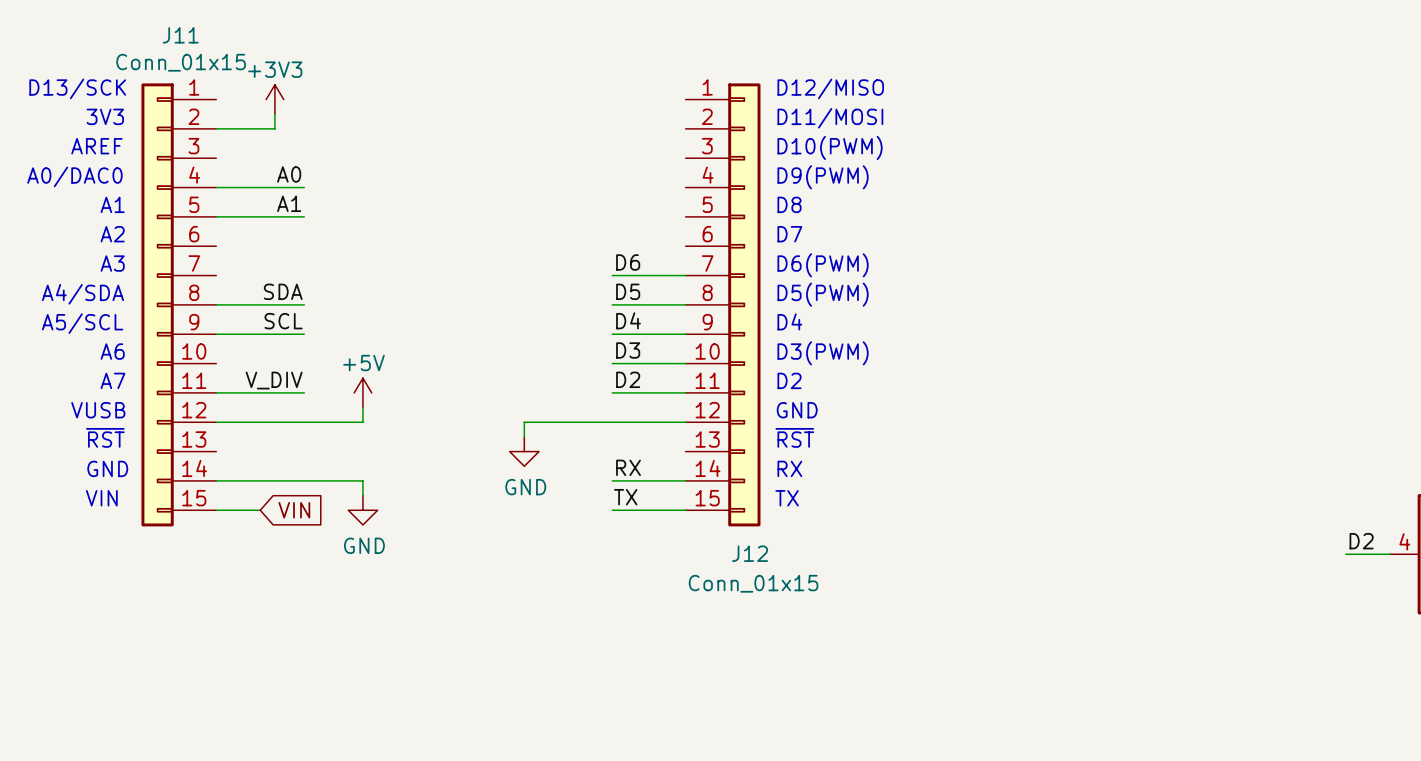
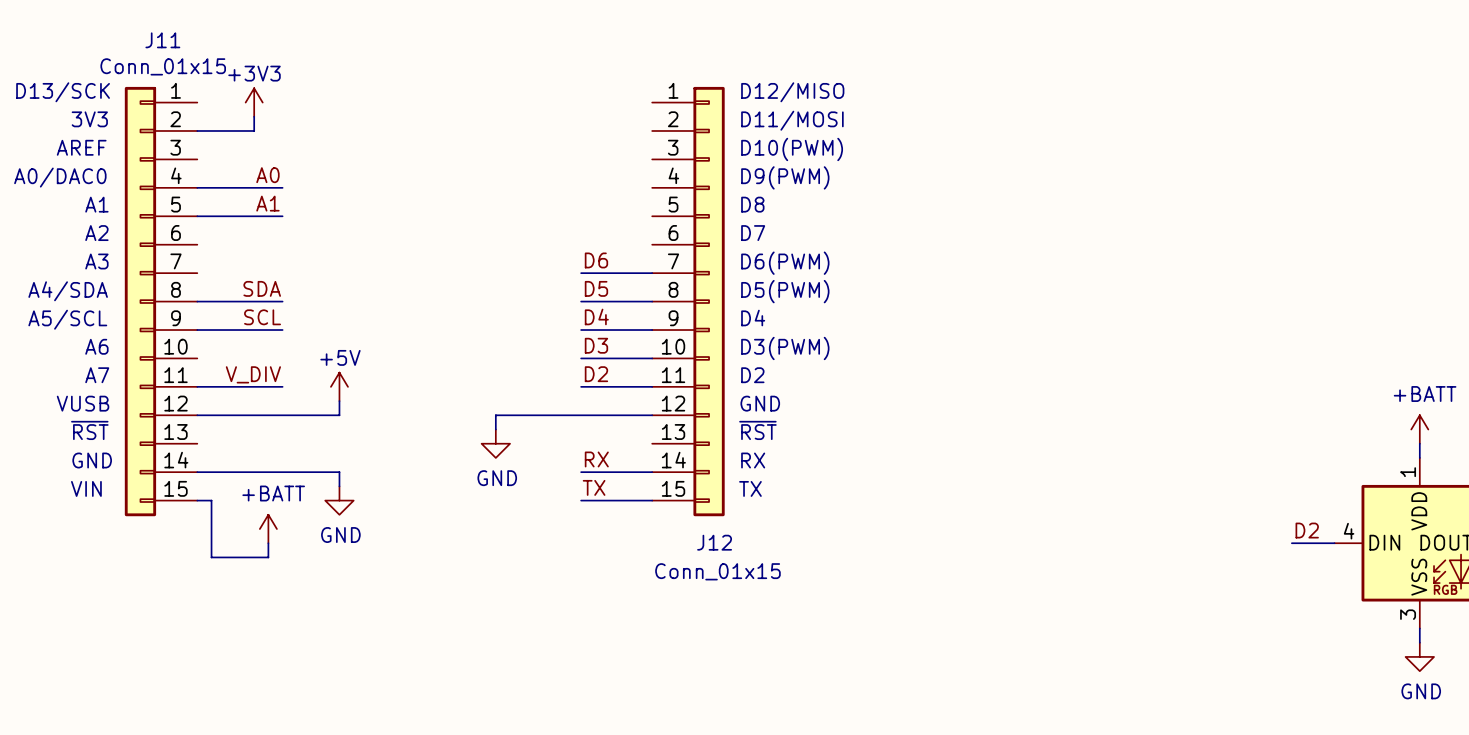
wire: (230, 510) (260, 510) -> (211, 500) (211, 557) (268, 557) (268, 543)
global label: VIN (294, 510) -> none
power symbol: none -> +BATT (268, 529)

